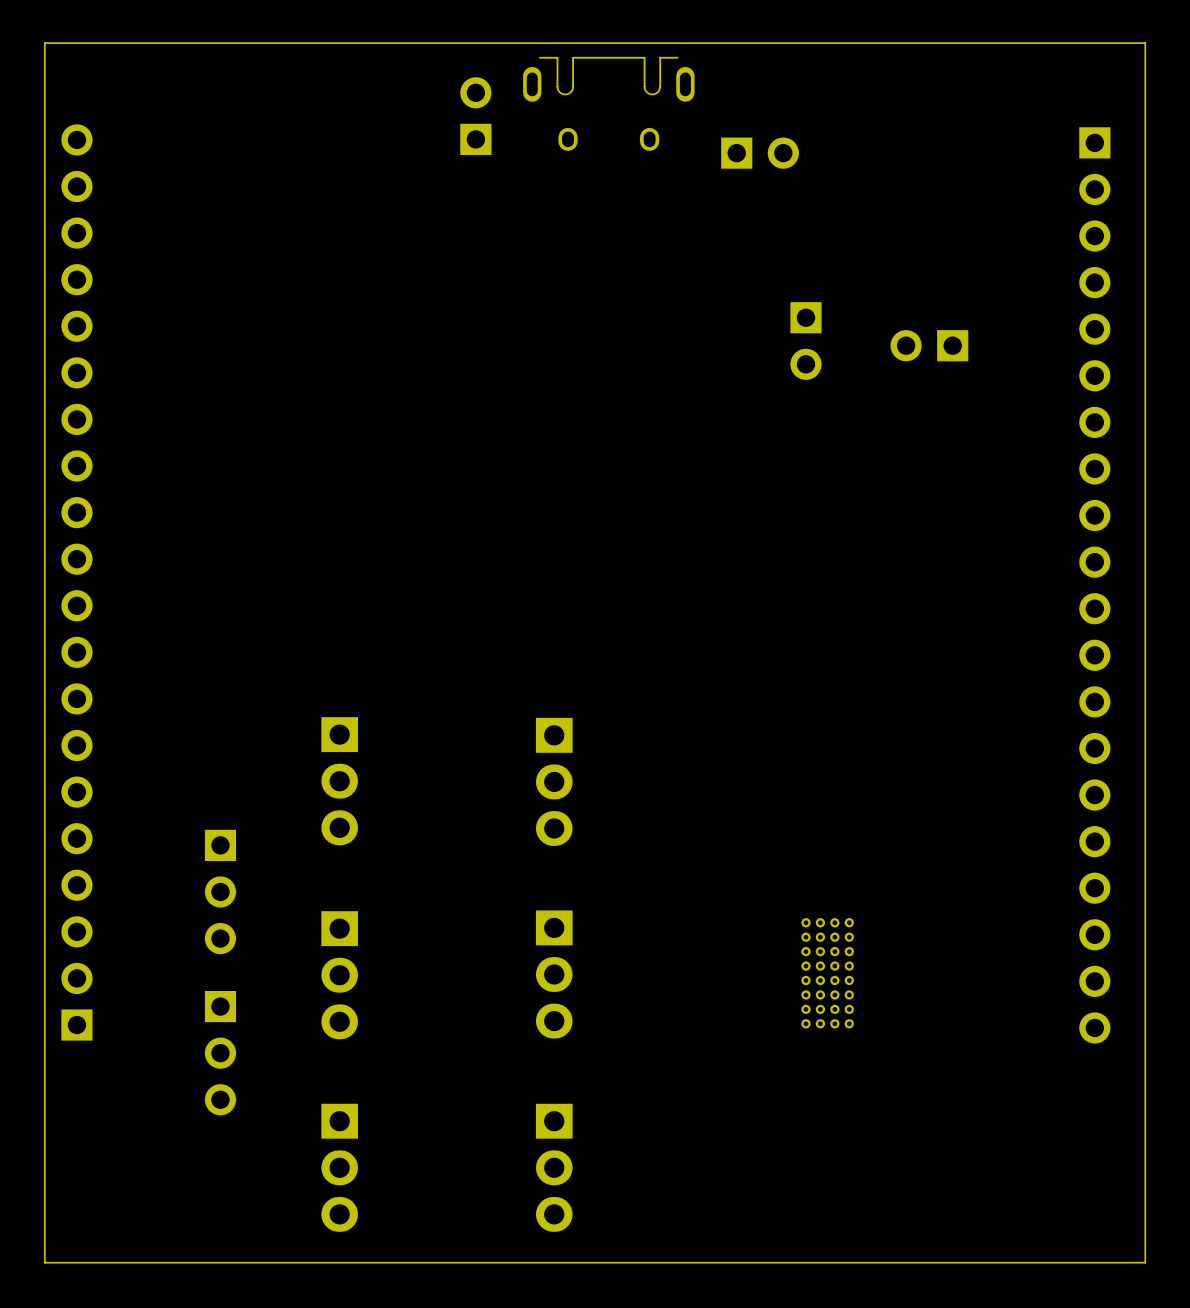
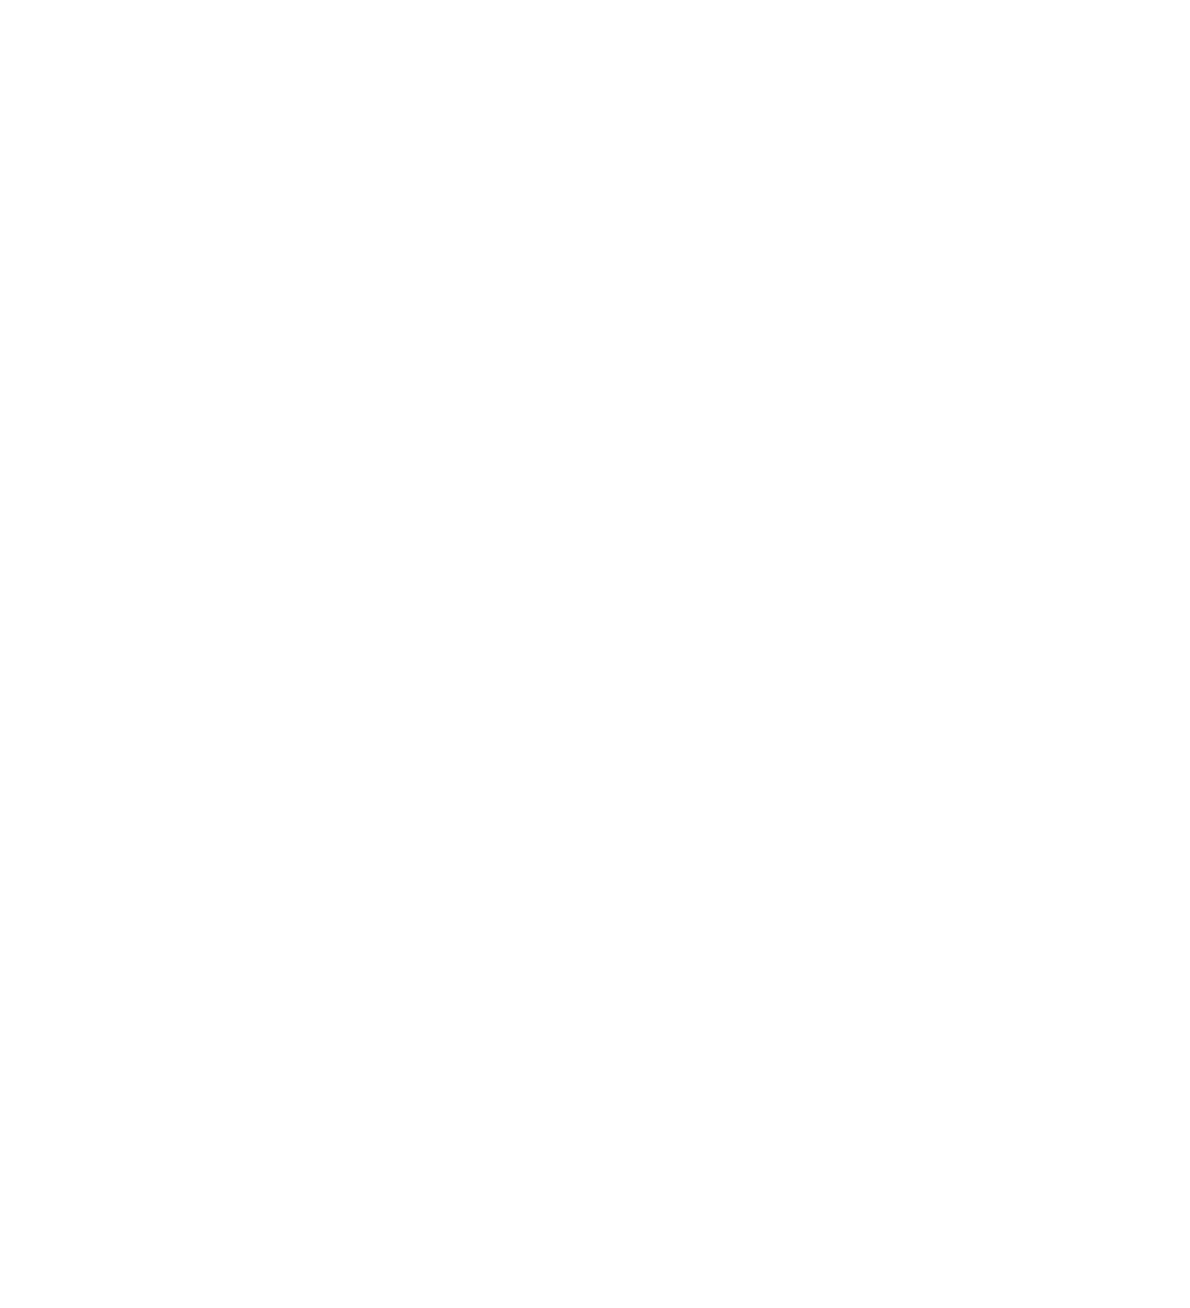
board edge: (1145, 43) (44, 43) (44, 1262) (1145, 1262) (1145, 43) -> none
part: (608, 103) -> none
part: (475, 116) -> none
part: (760, 153) -> none
part: (805, 341) -> none
part: (929, 345) -> none
part: (76, 582) -> none
part: (1094, 585) -> none
part: (339, 781) -> none
part: (554, 781) -> none
part: (220, 891) -> none
part: (827, 973) -> none
part: (554, 974) -> none
part: (339, 975) -> none
part: (220, 1053) -> none
part: (339, 1167) -> none
part: (554, 1167) -> none

